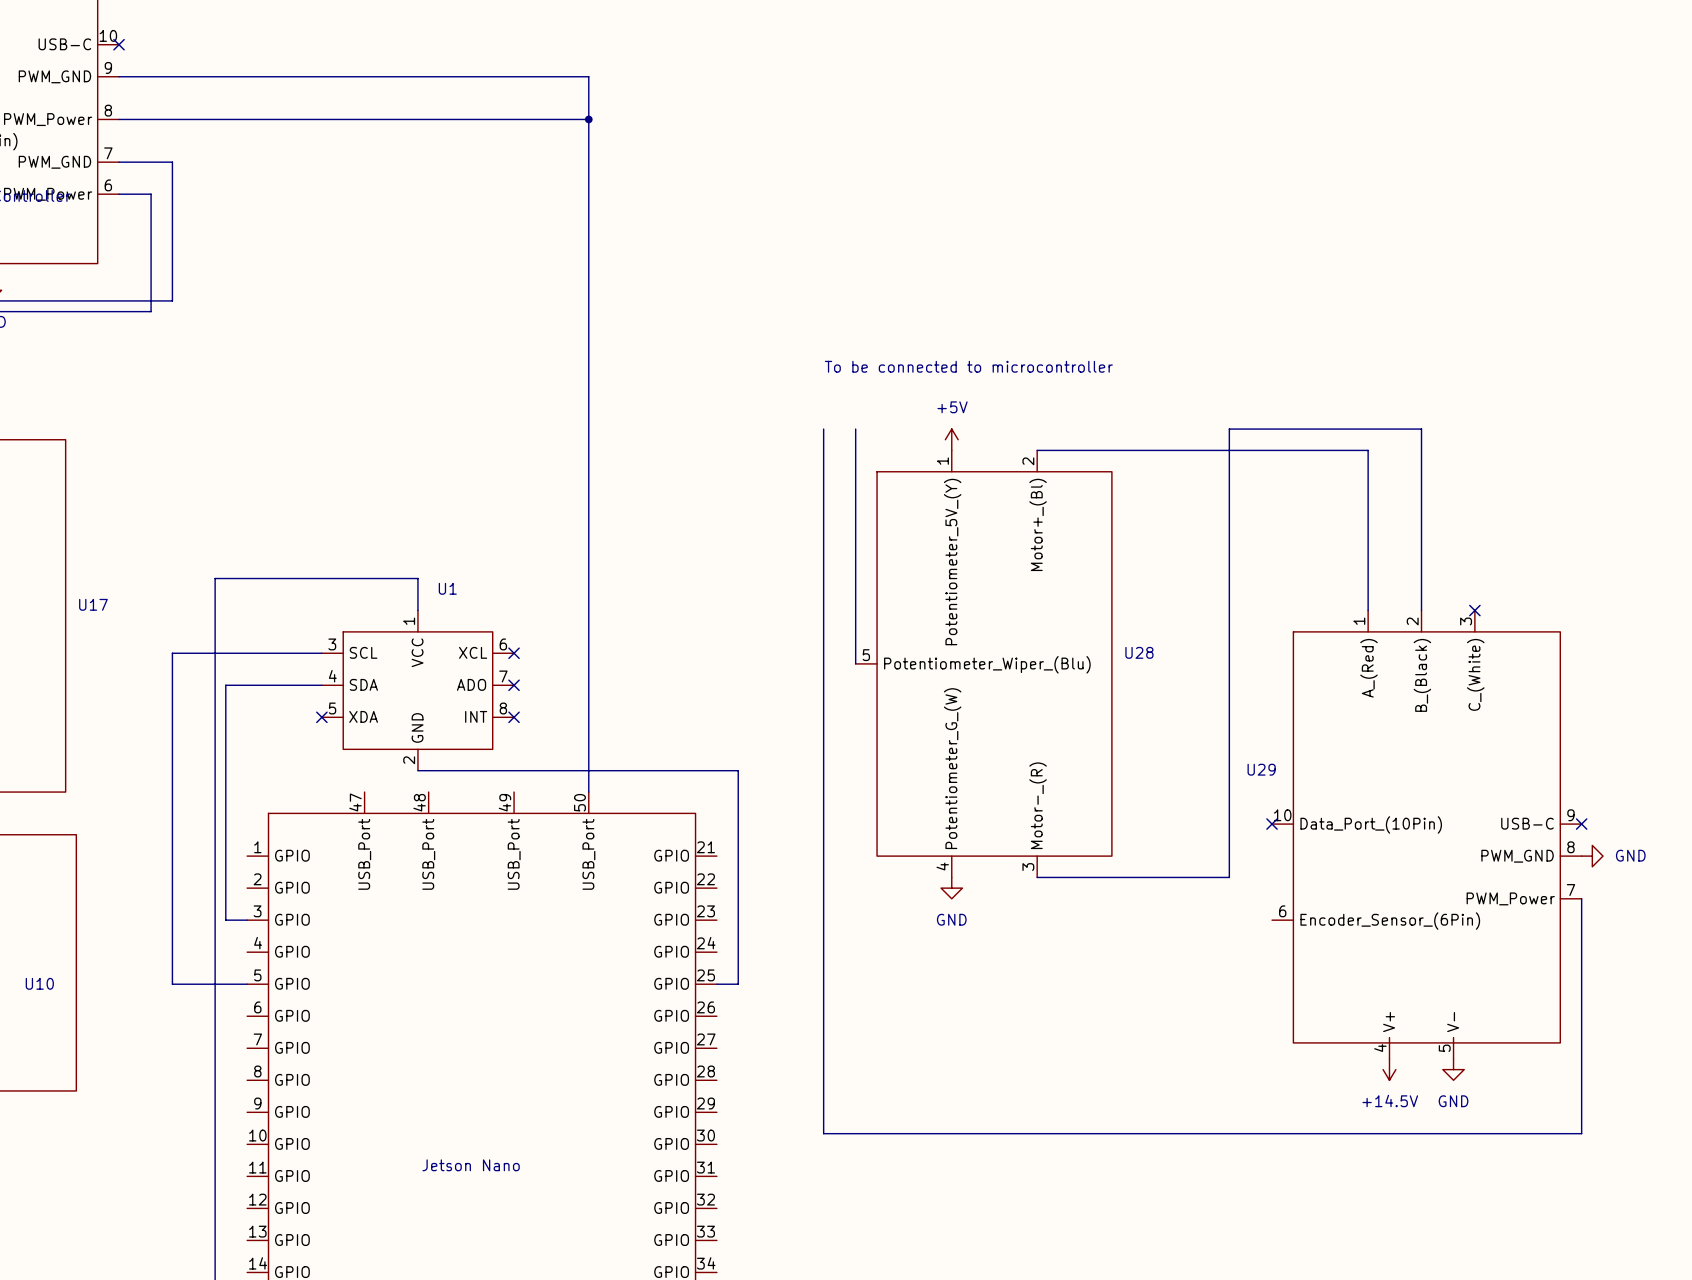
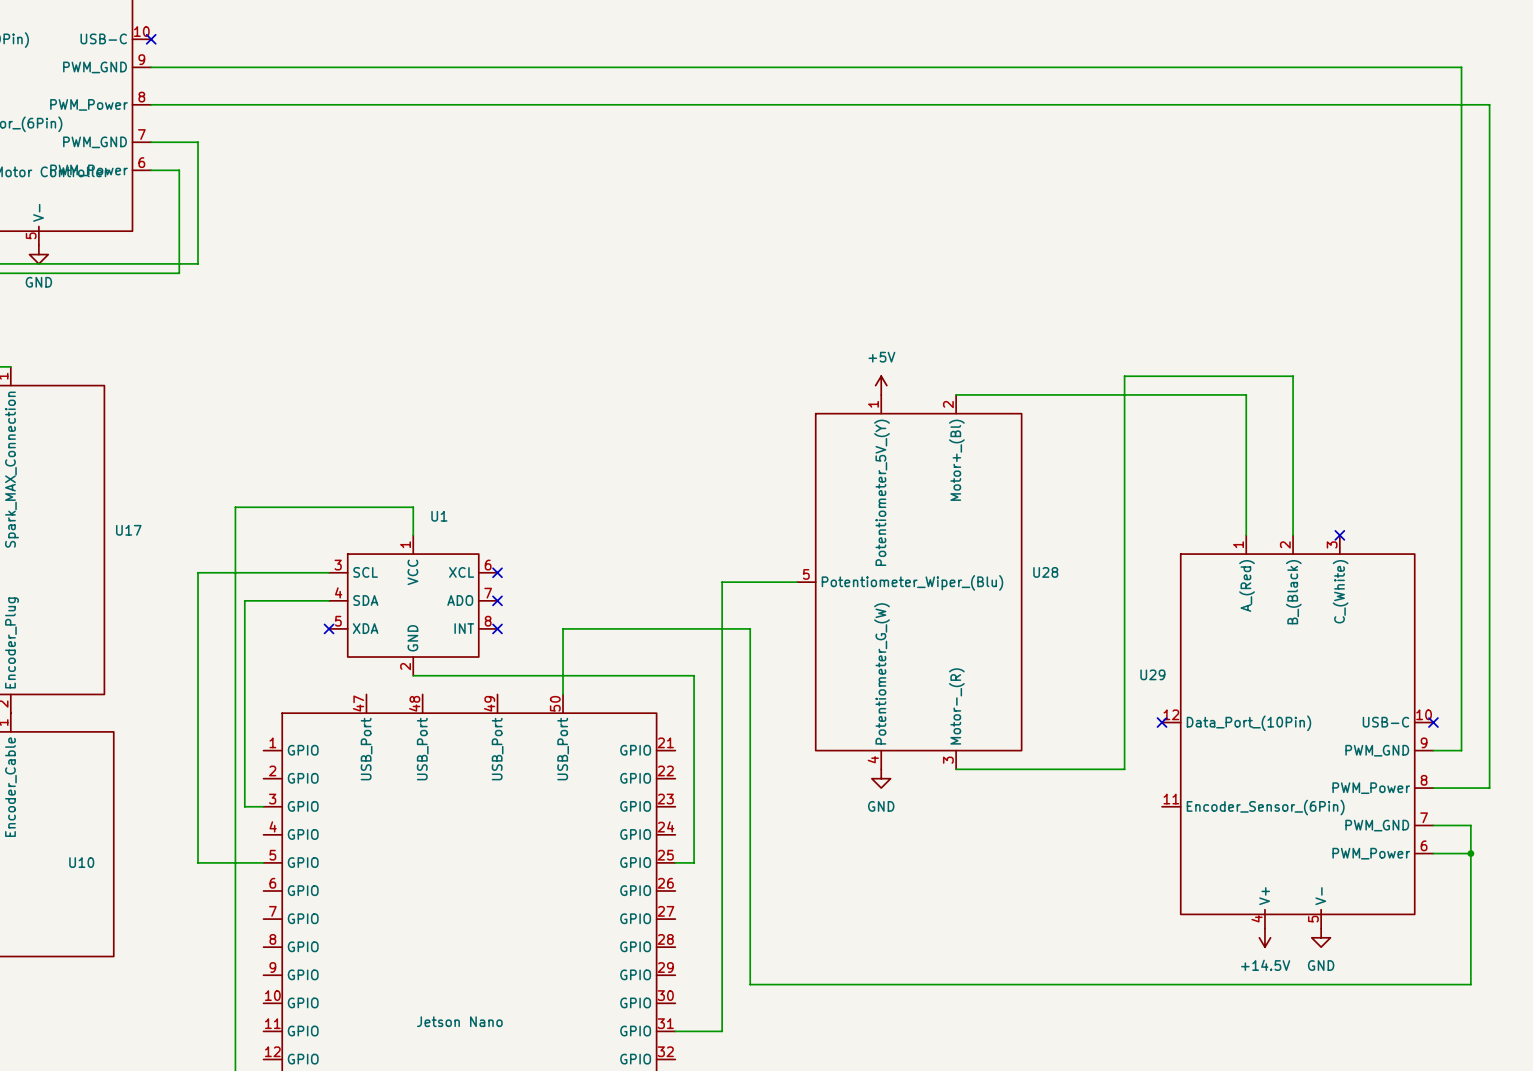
wire: (588, 76) (588, 717) -> (563, 67) (1461, 67) (1461, 750) (1433, 750)
junction: (588, 119) -> none
text: To be connected to microcontroller (968, 366) -> none
wire: (823, 429) (823, 1133) (1581, 1133) (1581, 898) -> (563, 104) (1489, 104) (1489, 788) (1433, 788)
wire: (855, 429) (855, 663) -> (675, 1031) (722, 1031) (722, 582) (797, 582)
U29 symbol: [1272, 610, 1582, 1059] -> [1162, 535, 1434, 929]
wire: none -> (563, 628) (750, 628) (750, 984) (1470, 984) (1470, 825) (1433, 825)
power symbol: GND (1592, 856) -> none
wire: none -> (1433, 853) (1470, 853)
junction: none -> (1470, 853)

